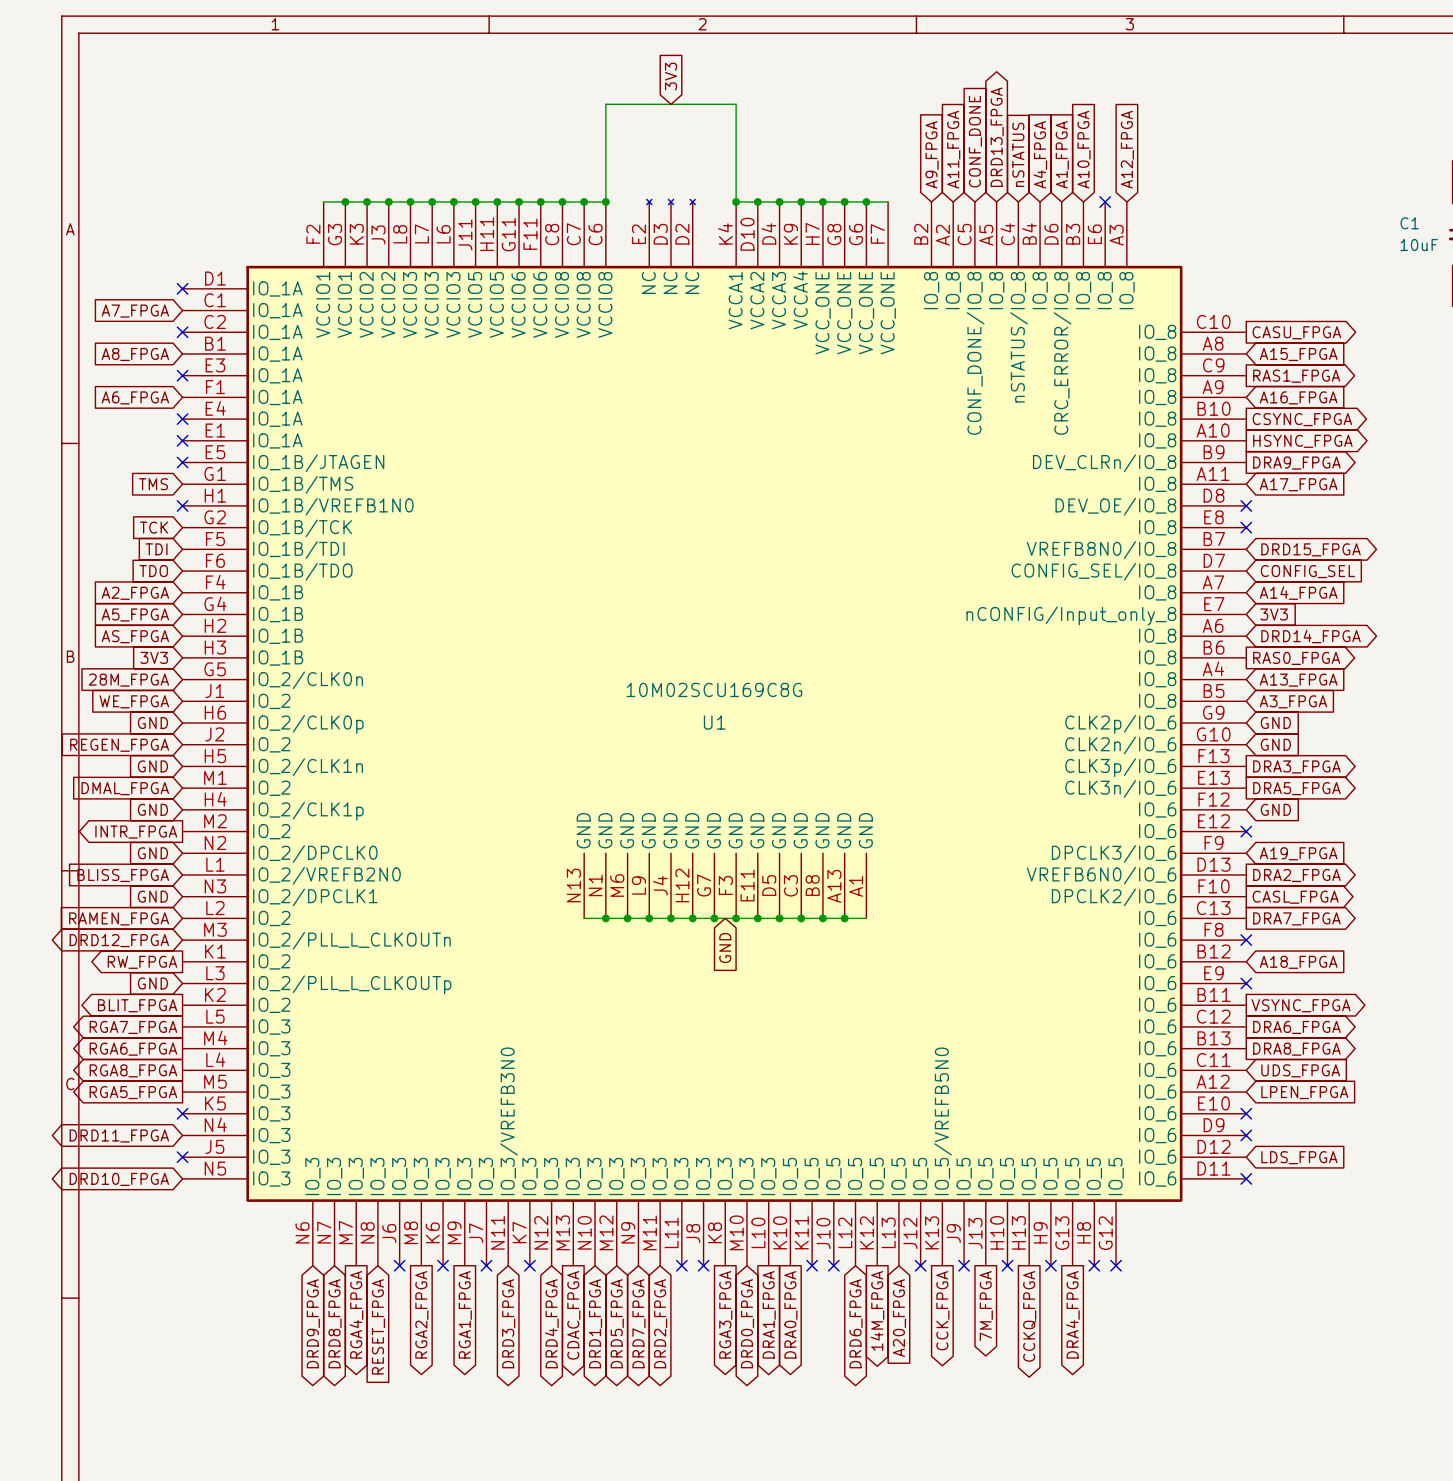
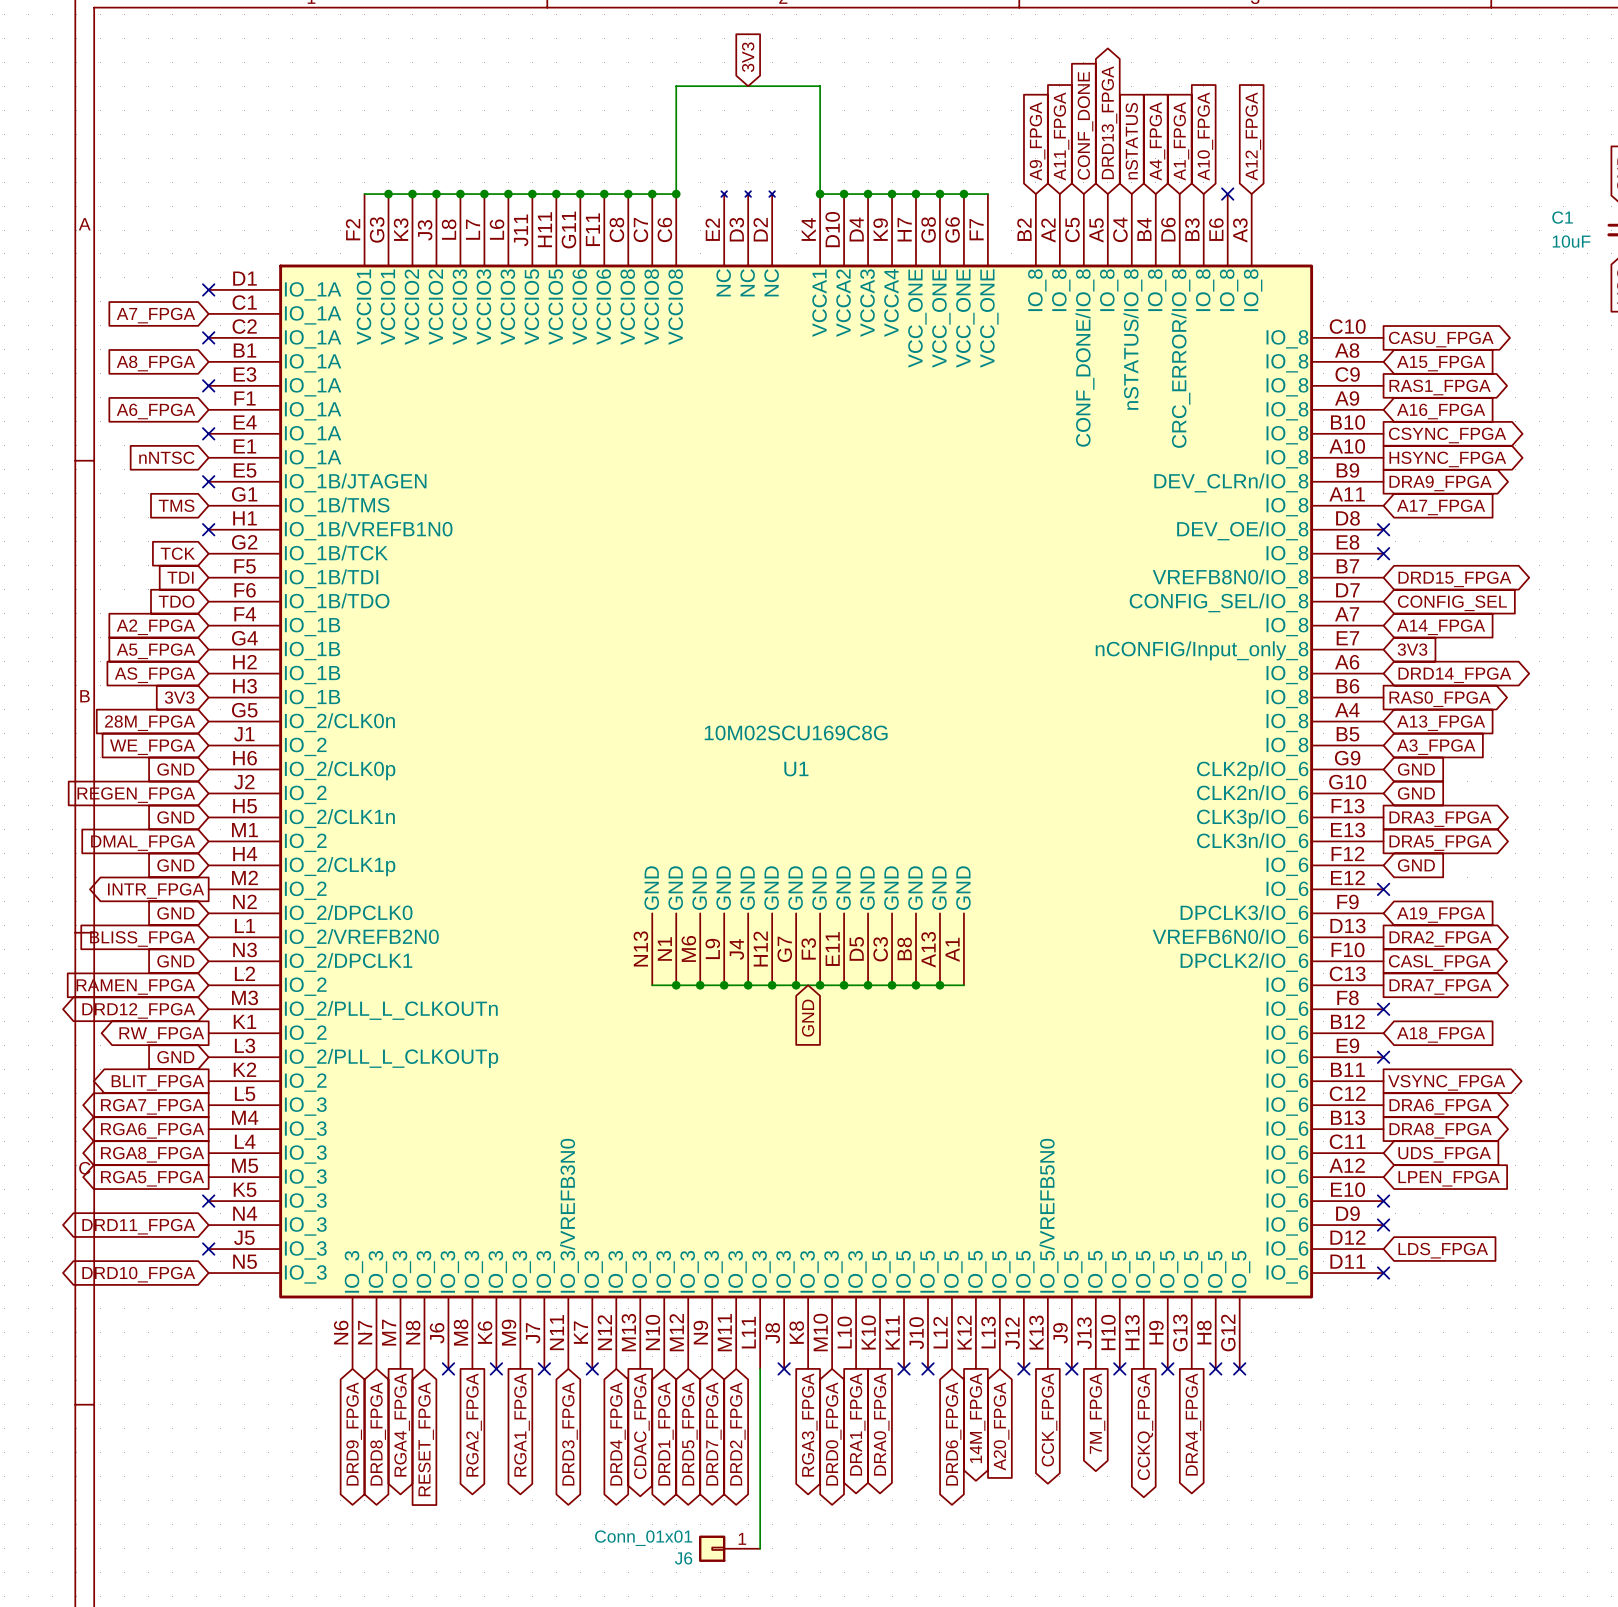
global label: none -> nNTSC (166, 457)
no-connect mark: (182, 440) -> none
wire: none -> (760, 1368) (760, 1548)
no-connect mark: (681, 1265) -> none
J6: none -> Conn_01x01 (729, 1548)

